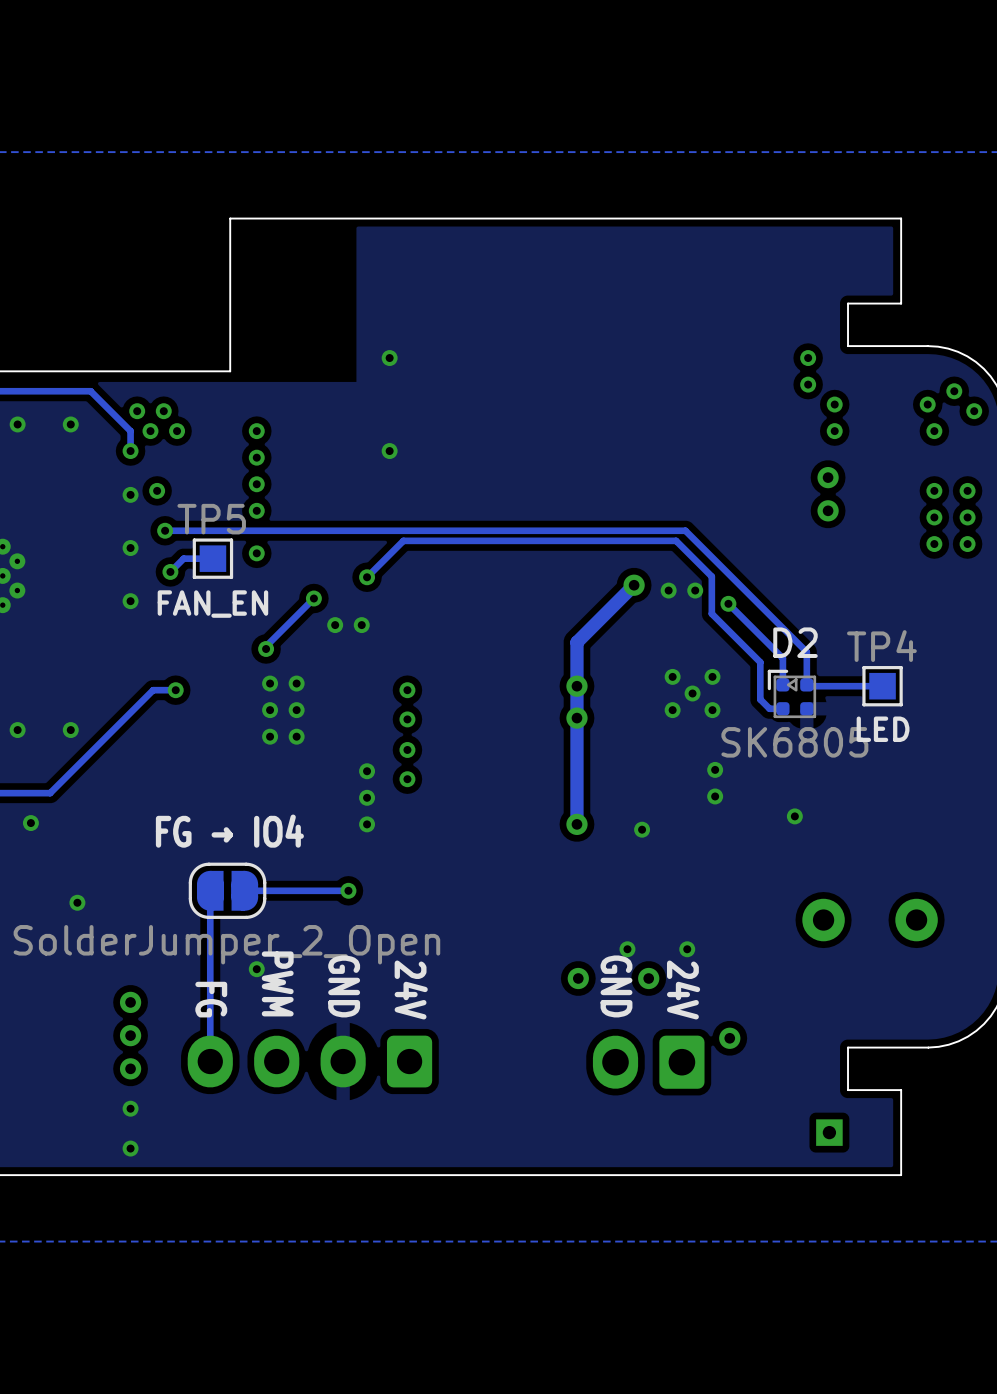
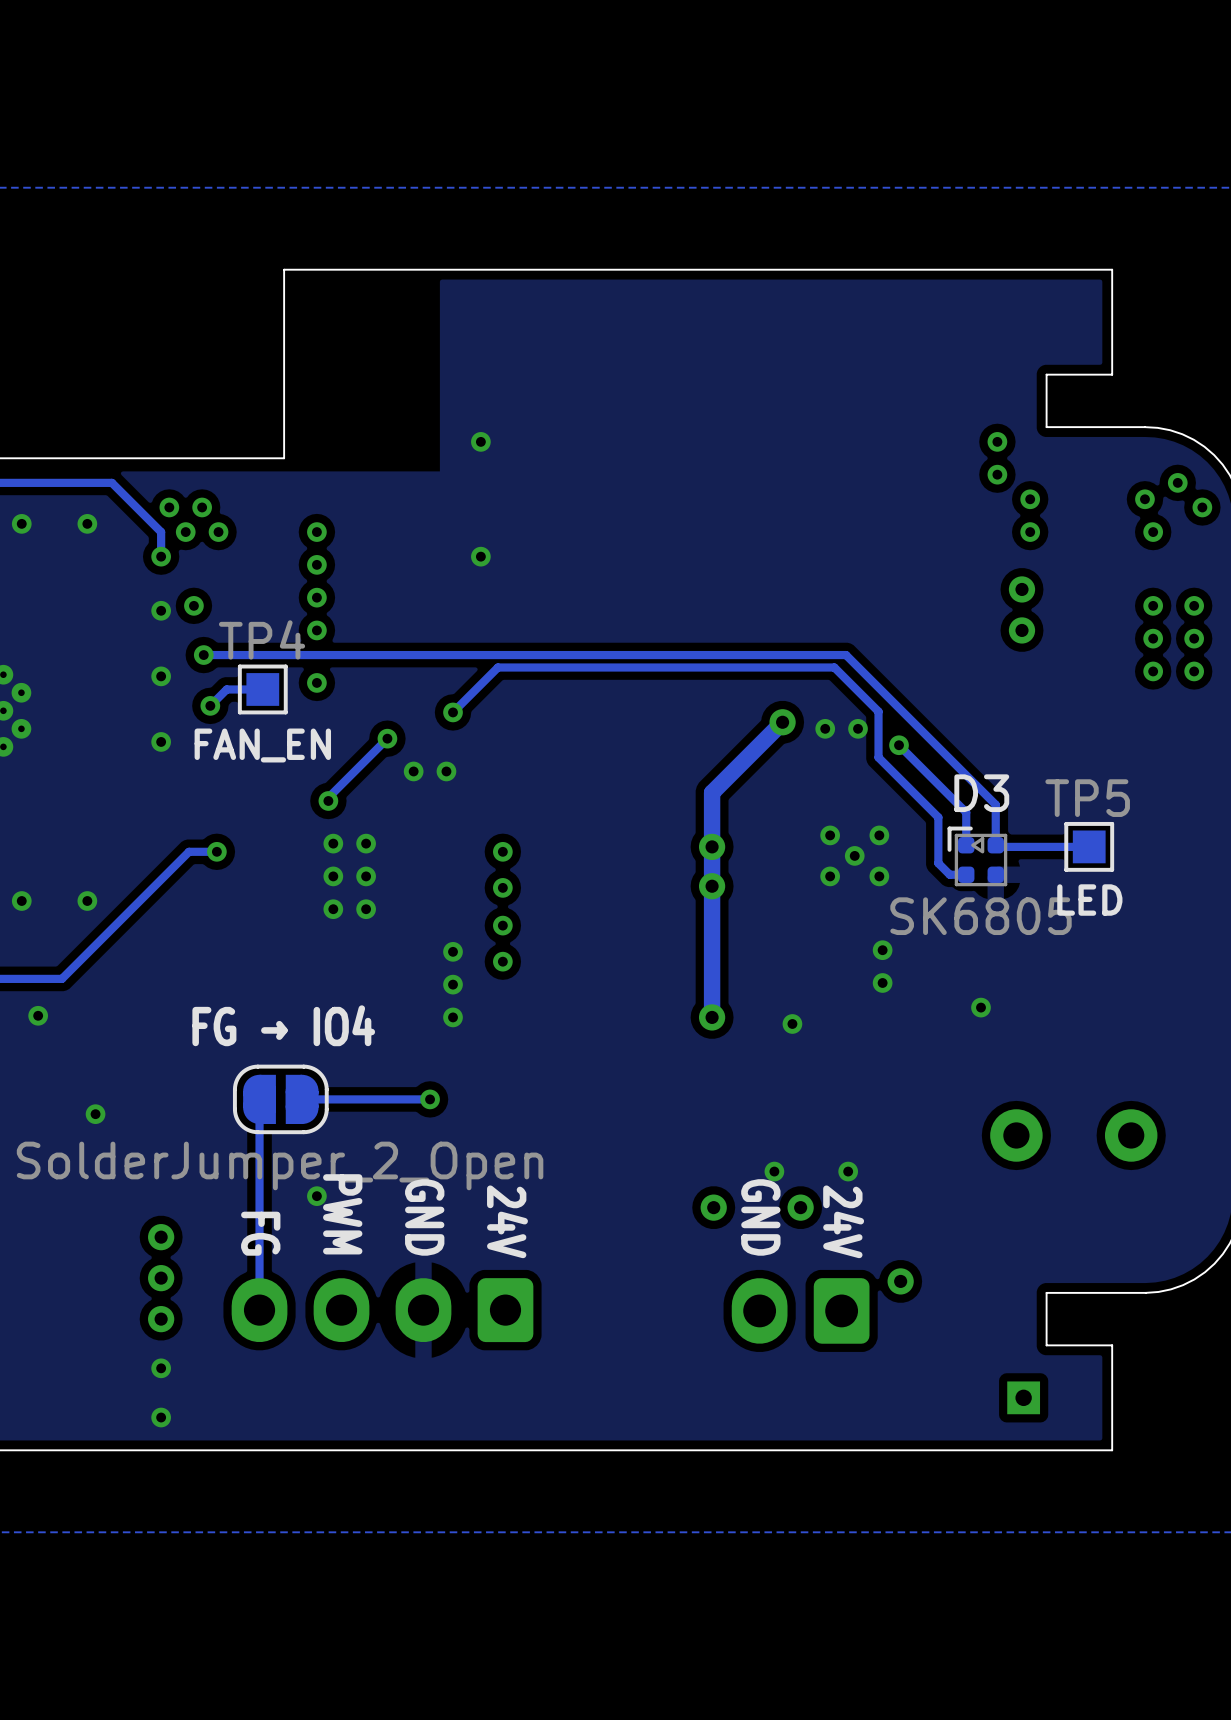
TP5 name: TP5 (211, 519) -> TP4 (262, 639)
D2 name: D2 (795, 642) -> D3 (981, 793)
TP4 name: TP4 (881, 646) -> TP5 (1087, 798)

